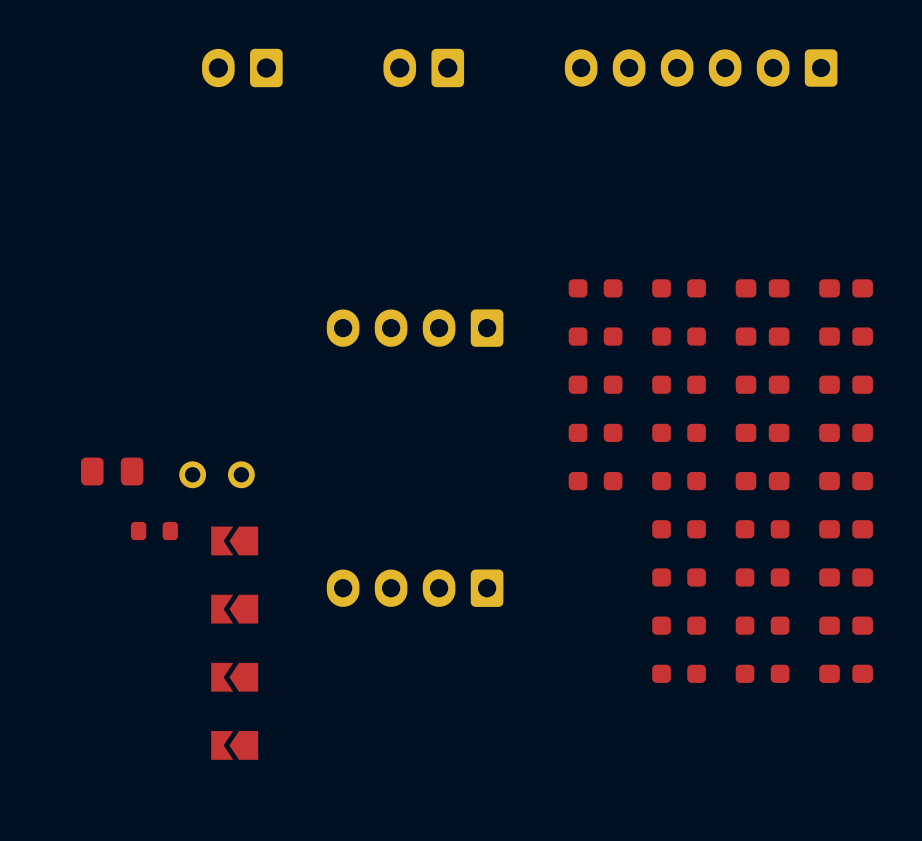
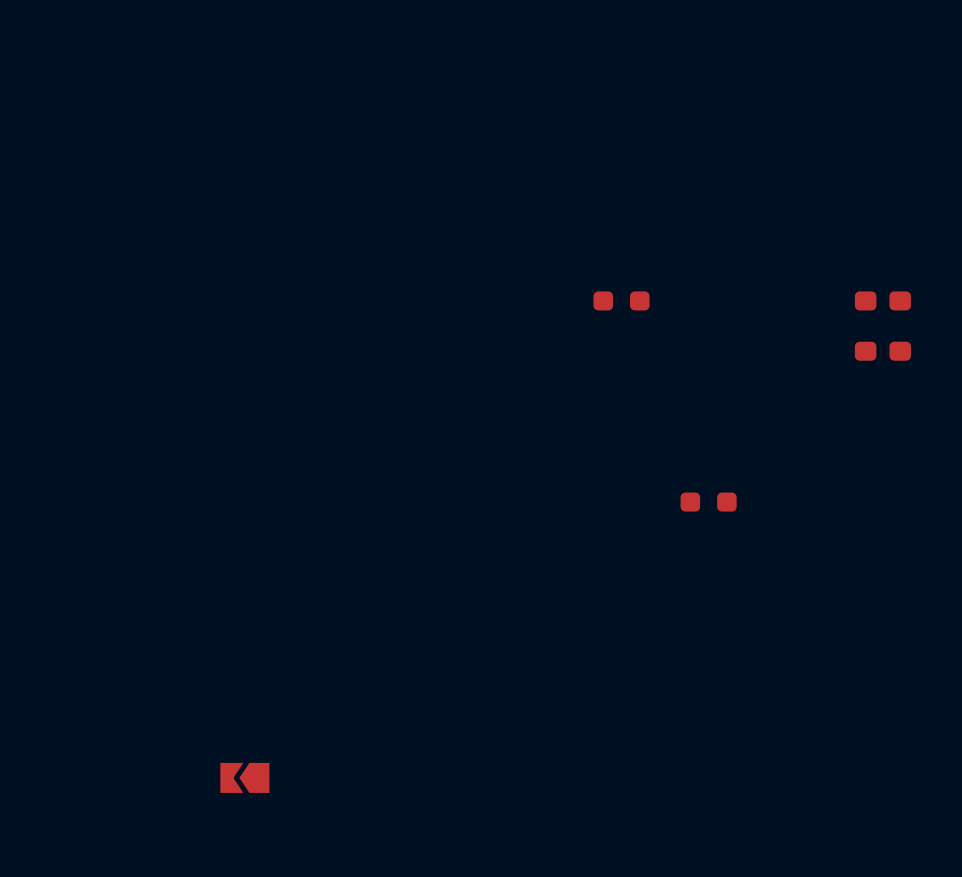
part: (242, 68) -> none
part: (423, 68) -> none
part: (701, 68) -> none
part: (679, 288) -> none
part: (762, 288) -> none
part: (415, 328) -> none
part: (595, 336) -> none
part: (679, 336) -> none
part: (762, 336) -> none
part: (595, 384) -> none
part: (679, 384) -> none
part: (762, 384) -> none
part: (846, 384) -> none
part: (595, 432) -> none
part: (679, 432) -> none
part: (762, 432) -> none
part: (846, 432) -> none
part: (112, 471) -> none
part: (217, 474) -> none
part: (595, 481) -> none
part: (762, 481) -> none
part: (846, 481) -> none
part: (679, 529) -> none
part: (762, 529) -> none
part: (846, 529) -> none
part: (154, 531) -> none
part: (234, 540) -> none
part: (679, 577) -> none
part: (762, 577) -> none
part: (846, 577) -> none
part: (415, 588) -> none
part: (234, 609) -> none
part: (679, 625) -> none
part: (762, 625) -> none
part: (846, 625) -> none
part: (679, 673) -> none
part: (762, 673) -> none
part: (846, 673) -> none
part: (234, 677) -> none

